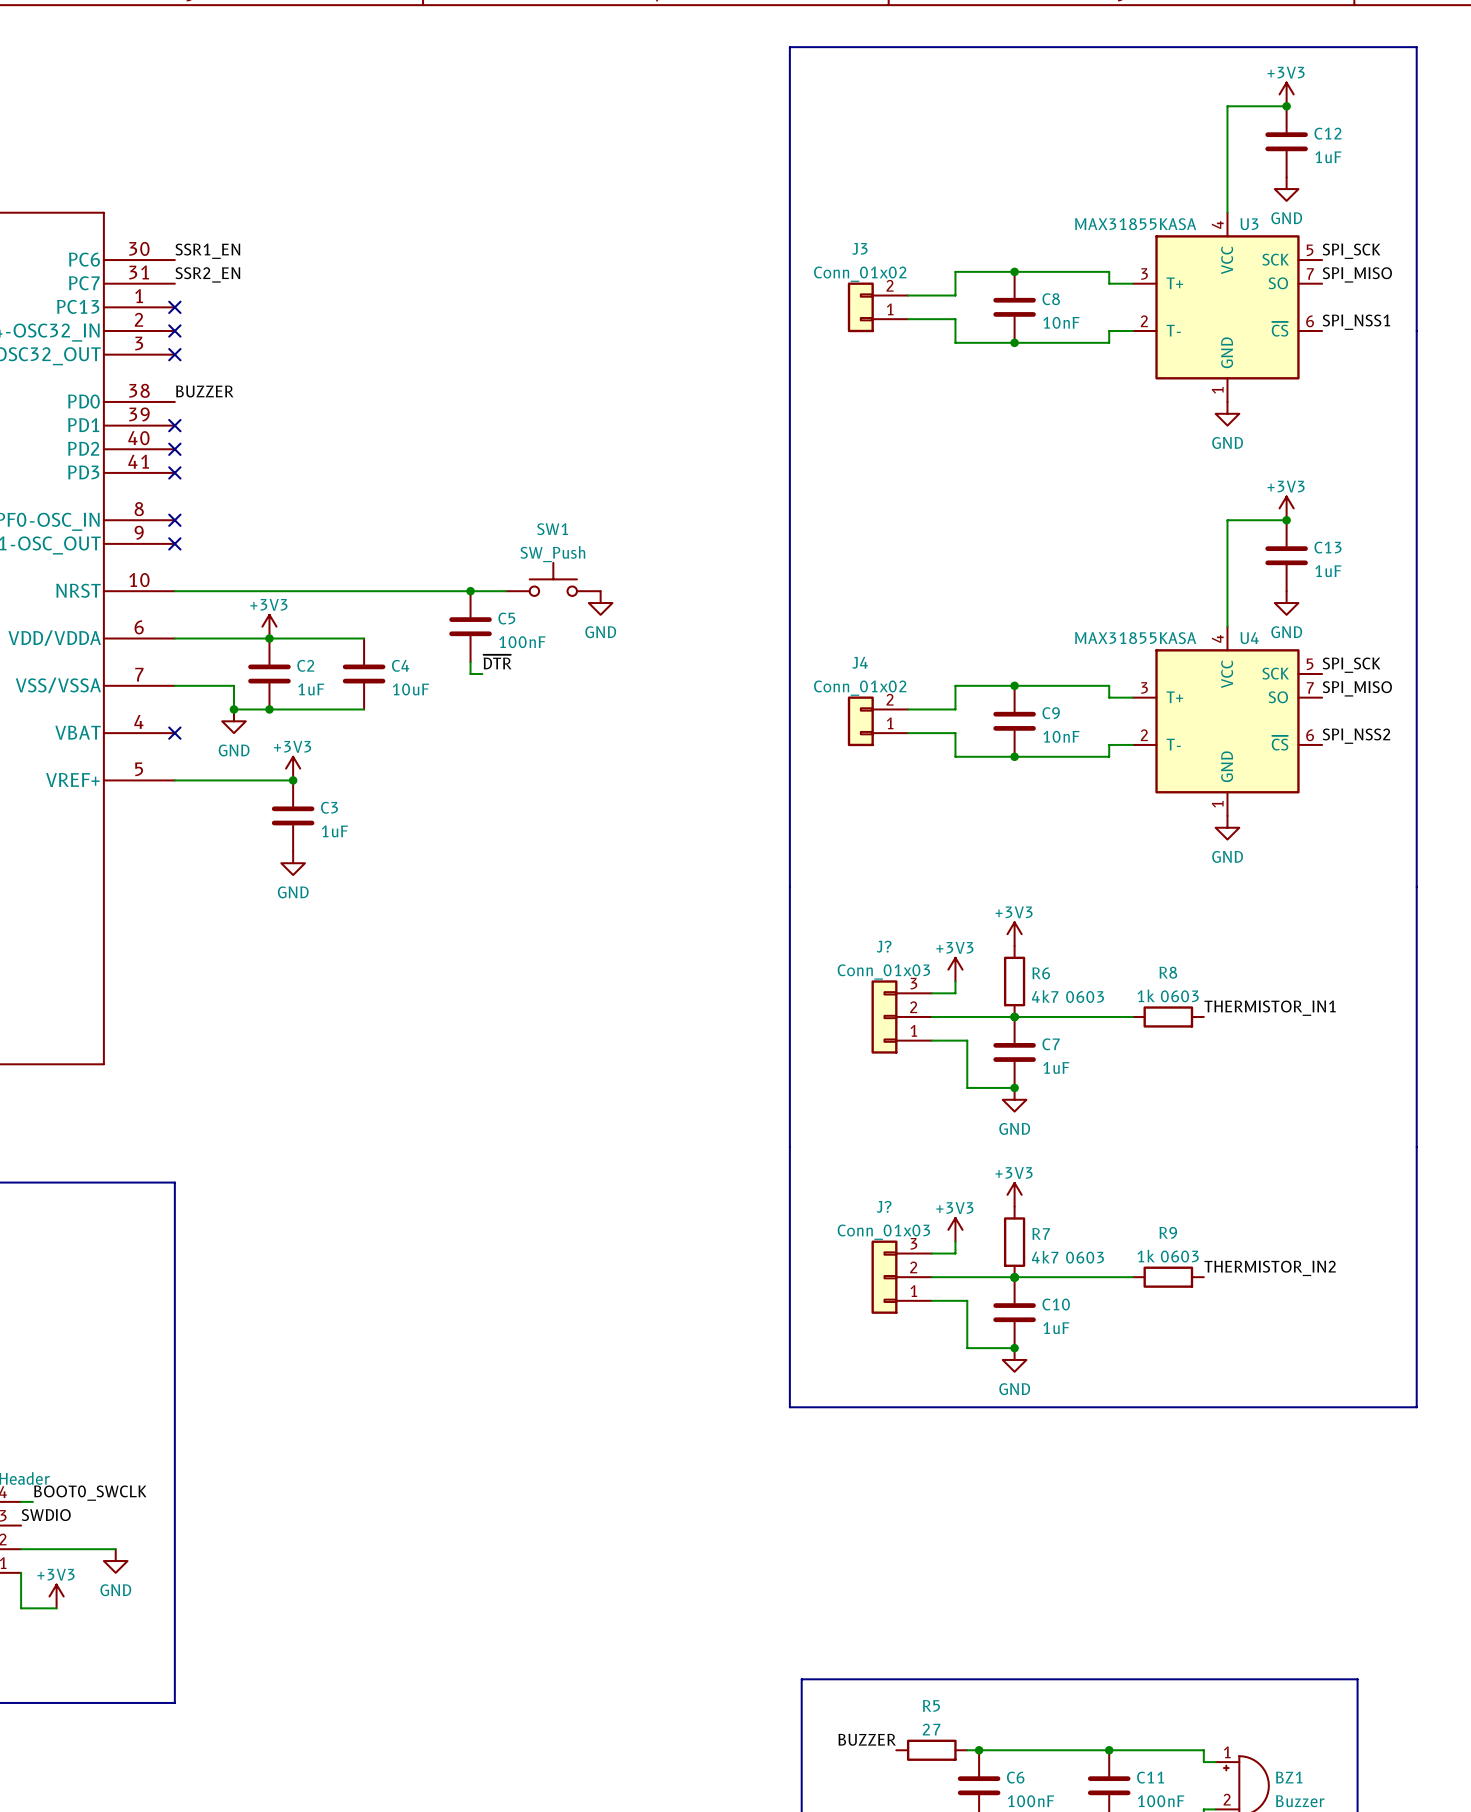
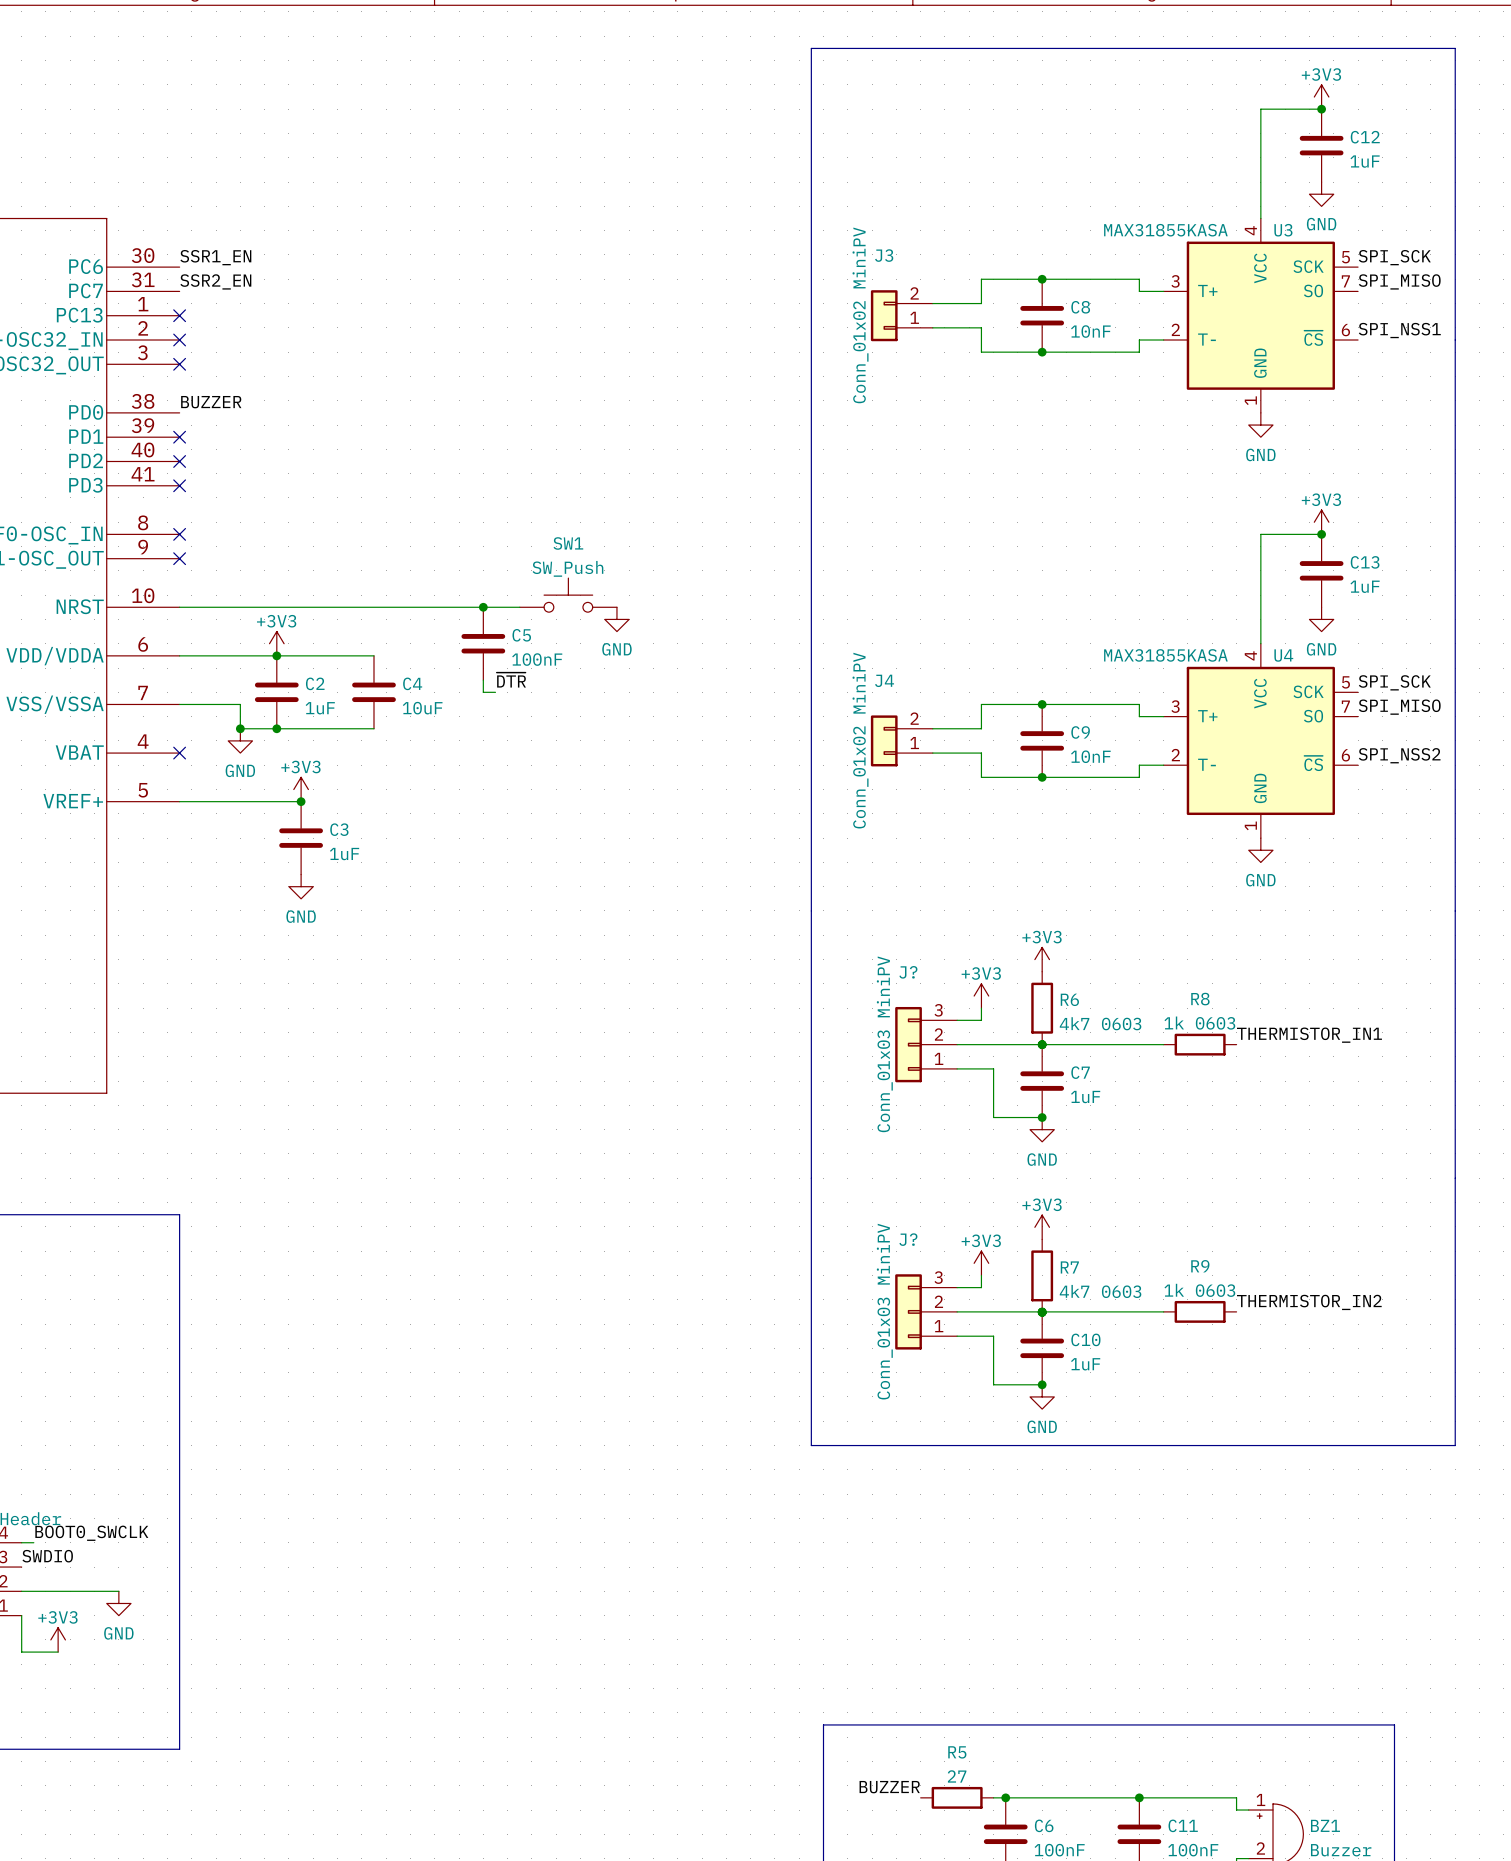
J3 value: Conn_01x02 (860, 274) -> Conn_01x02 MiniPV (860, 315)
J4 value: Conn_01x02 (860, 688) -> Conn_01x02 MiniPV (860, 740)
J? value: Conn_01x03 (883, 972) -> Conn_01x03 MiniPV (884, 1044)
J? value: Conn_01x03 (883, 1232) -> Conn_01x03 MiniPV (884, 1311)

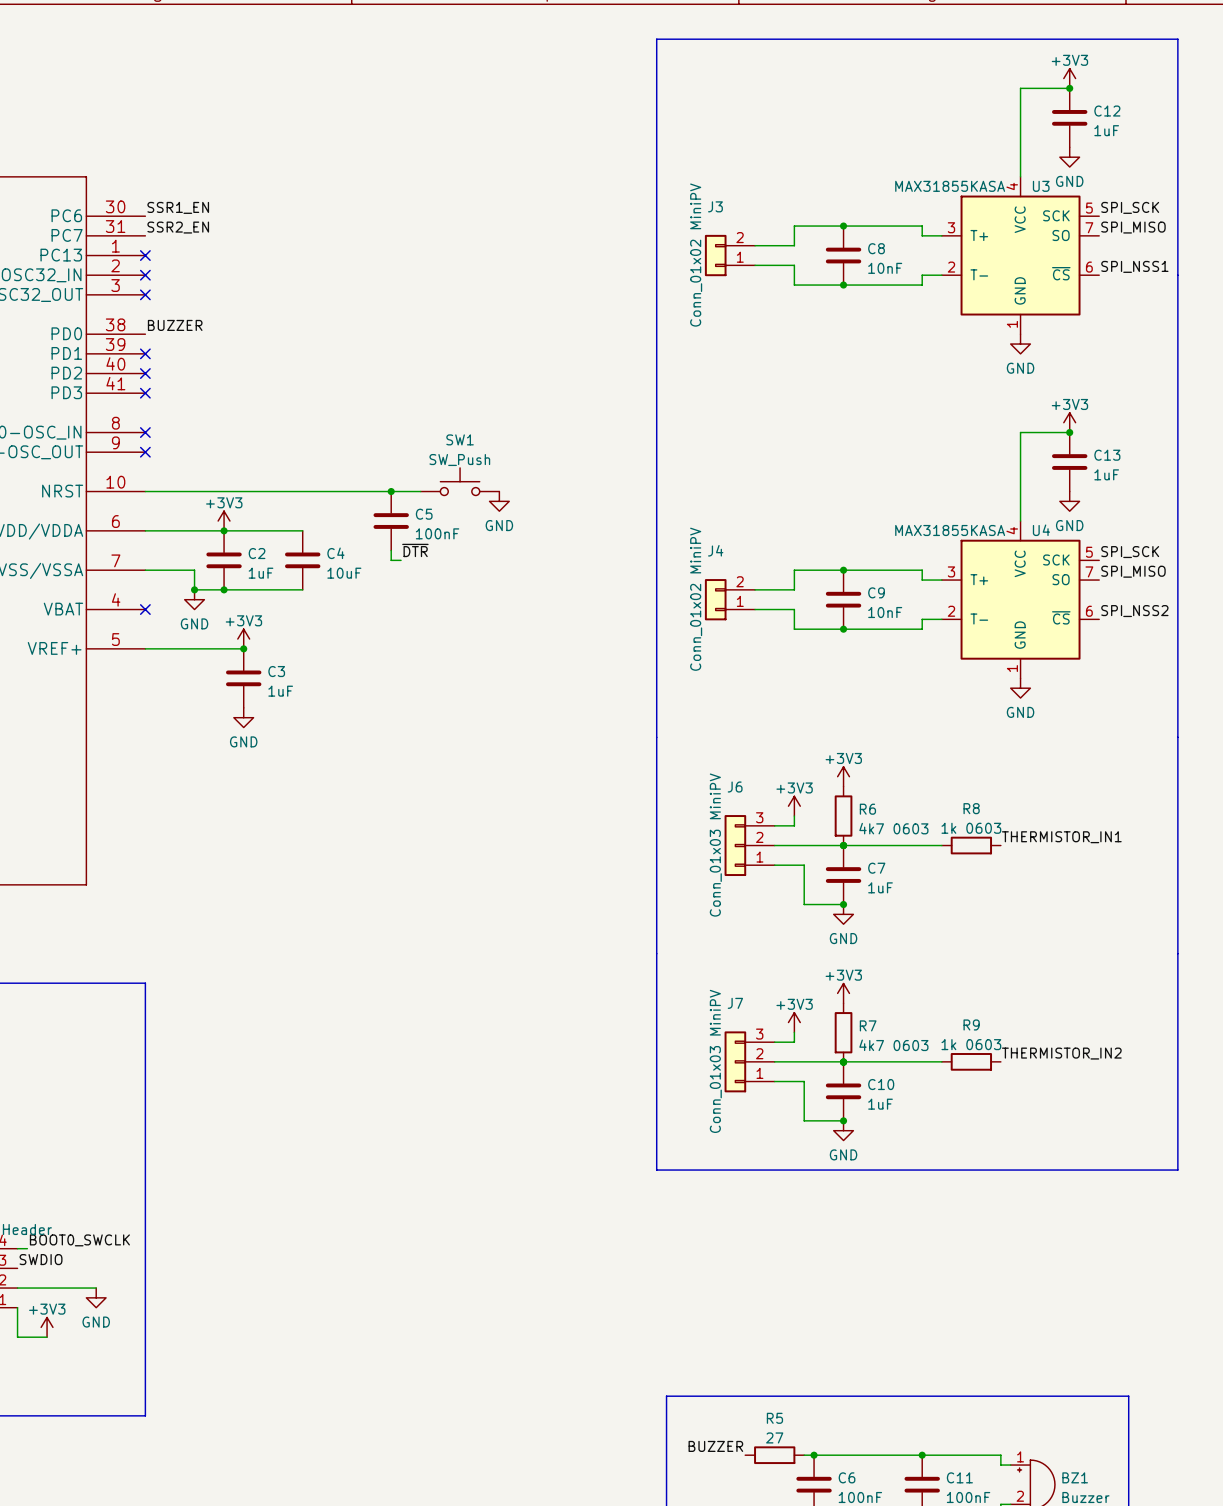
J? name: J? (908, 972) -> J6 (735, 787)
J? name: J? (908, 1239) -> J7 (735, 1003)

